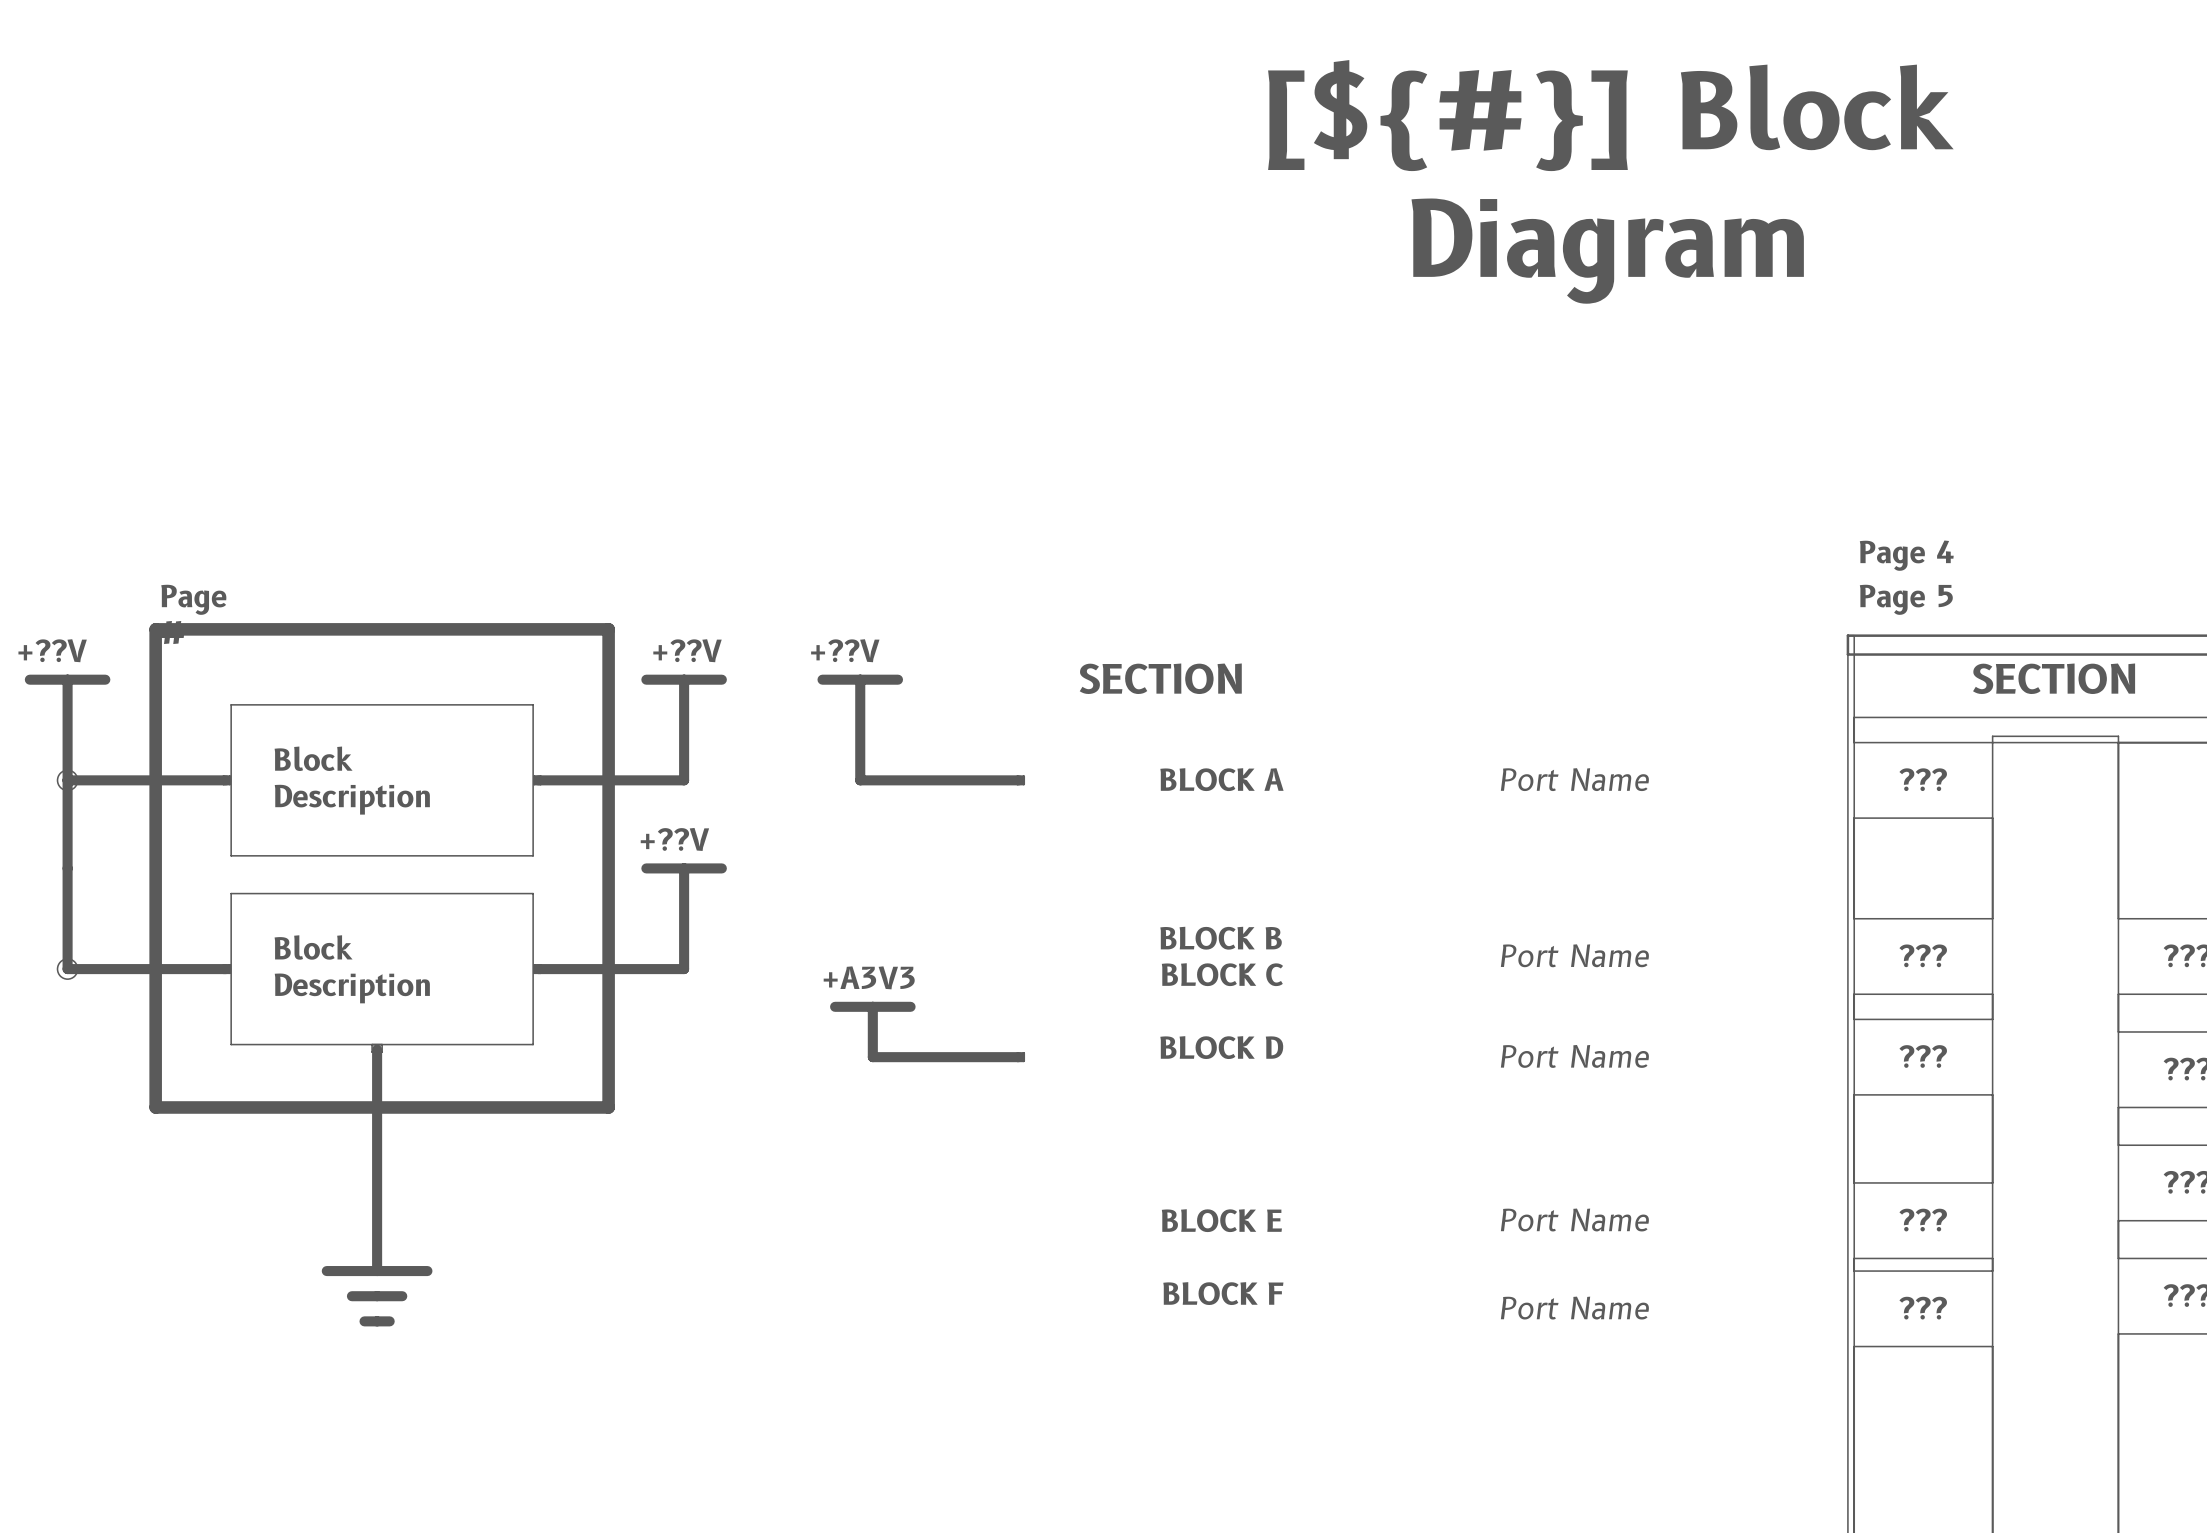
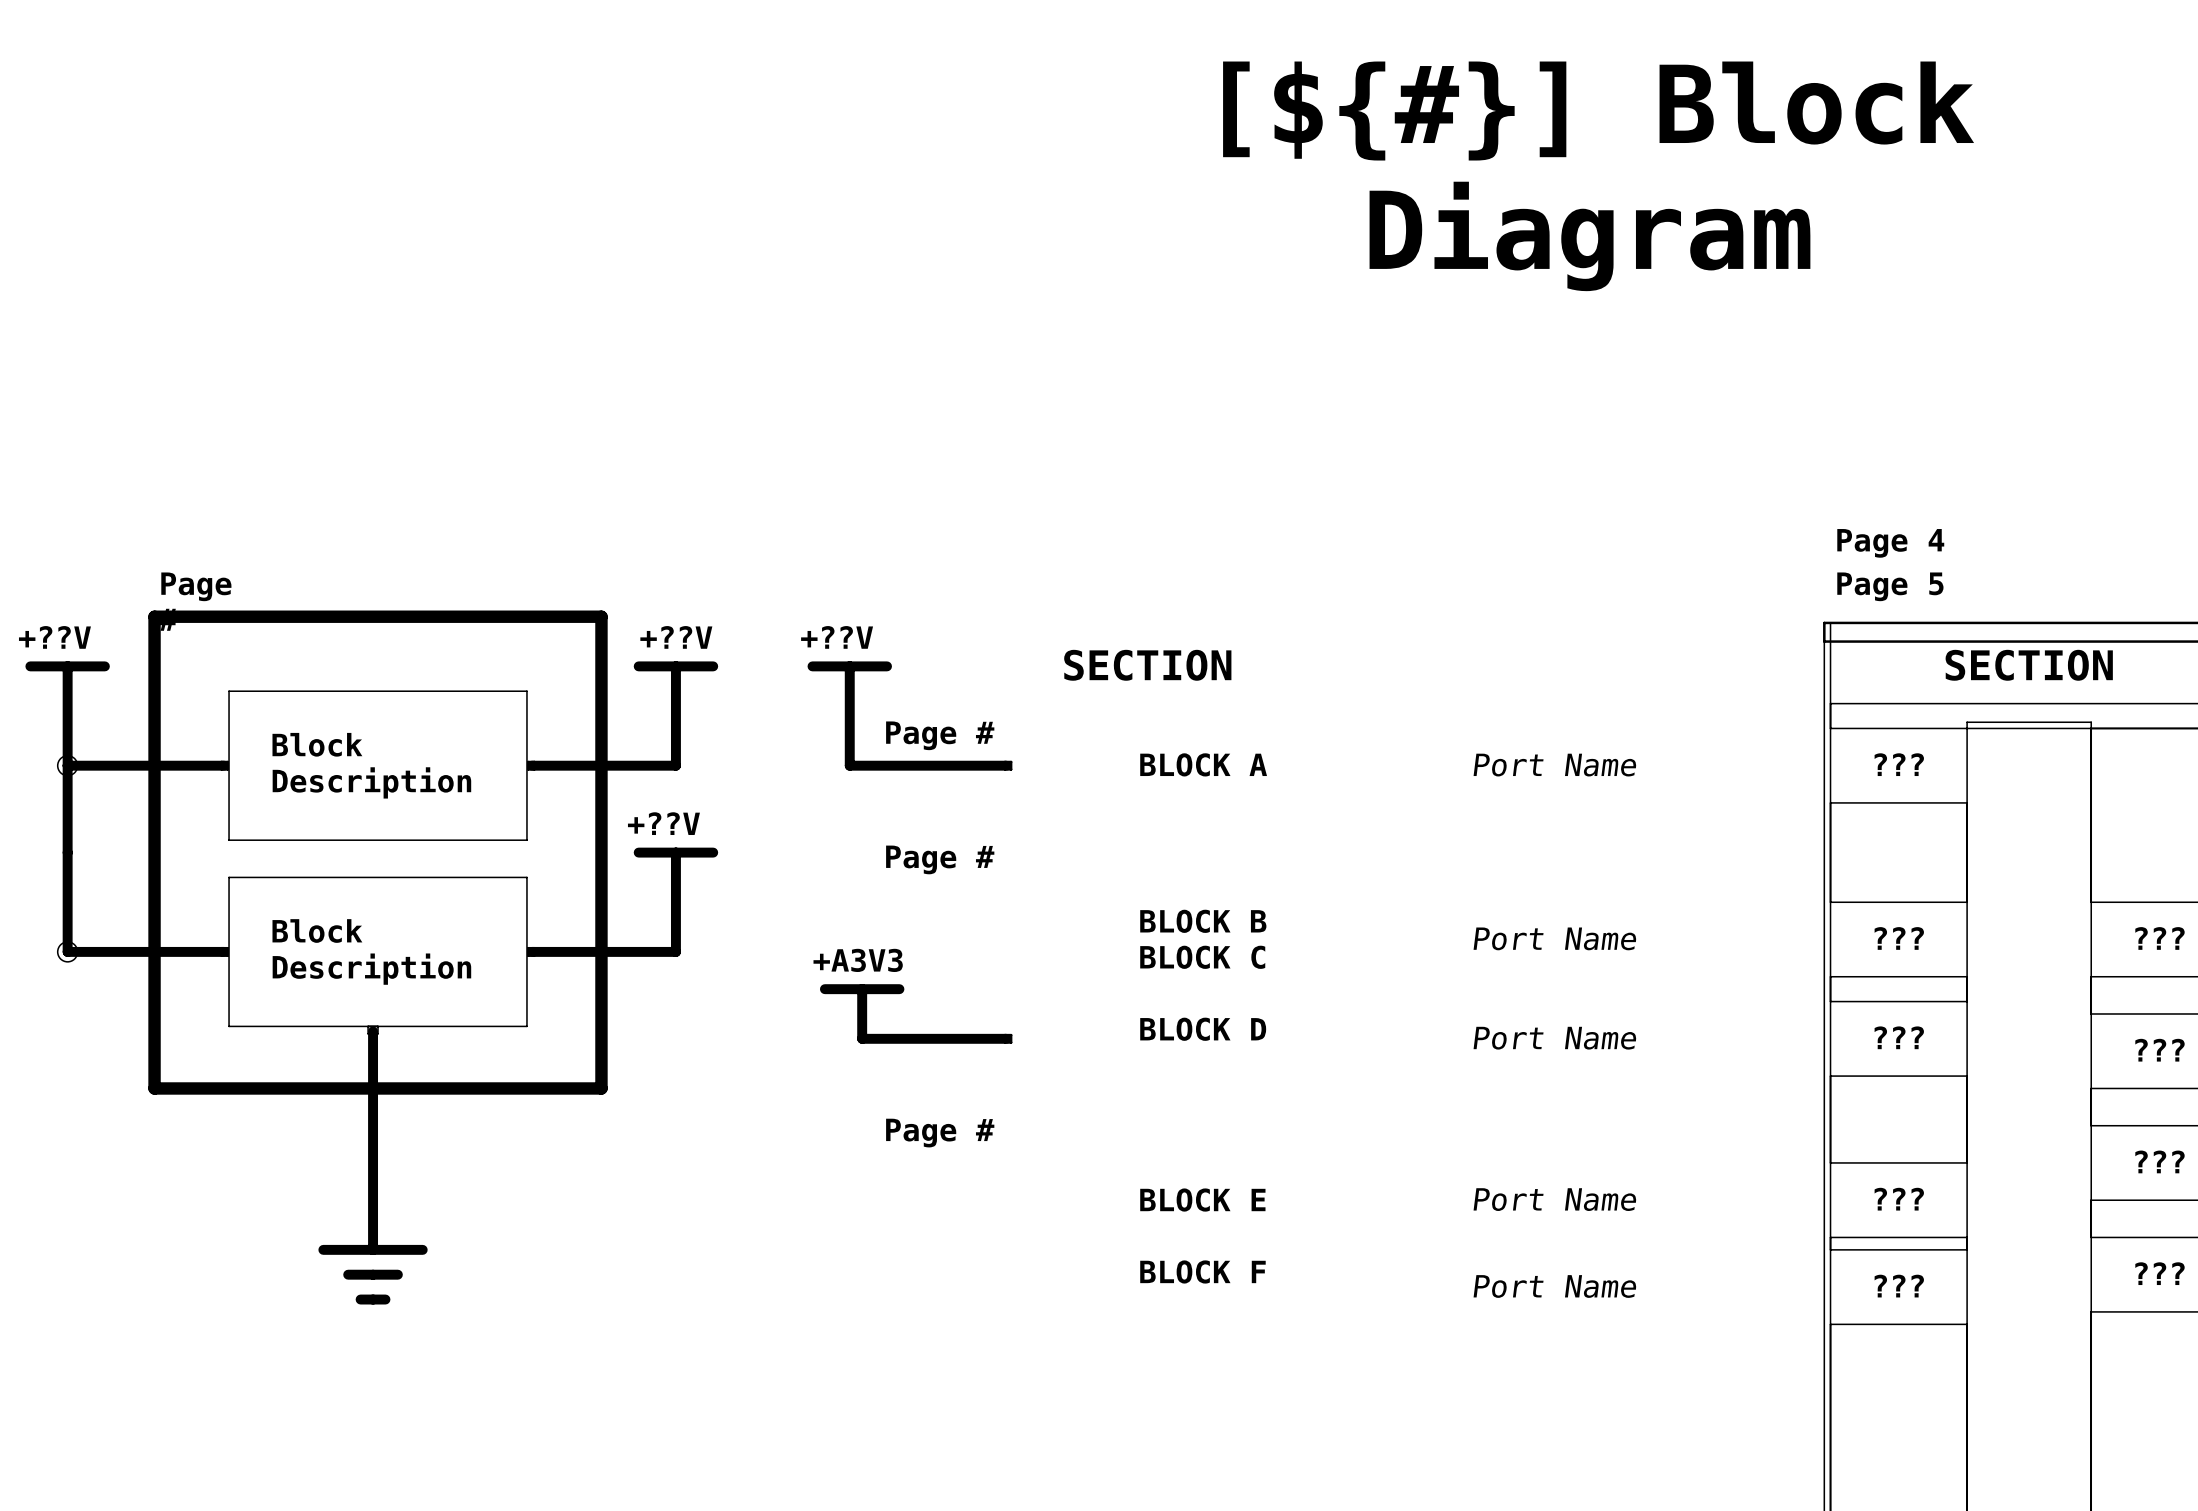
text: none -> Page # (940, 735)
text: none -> Page # (940, 859)
text: none -> Page # (940, 1133)

